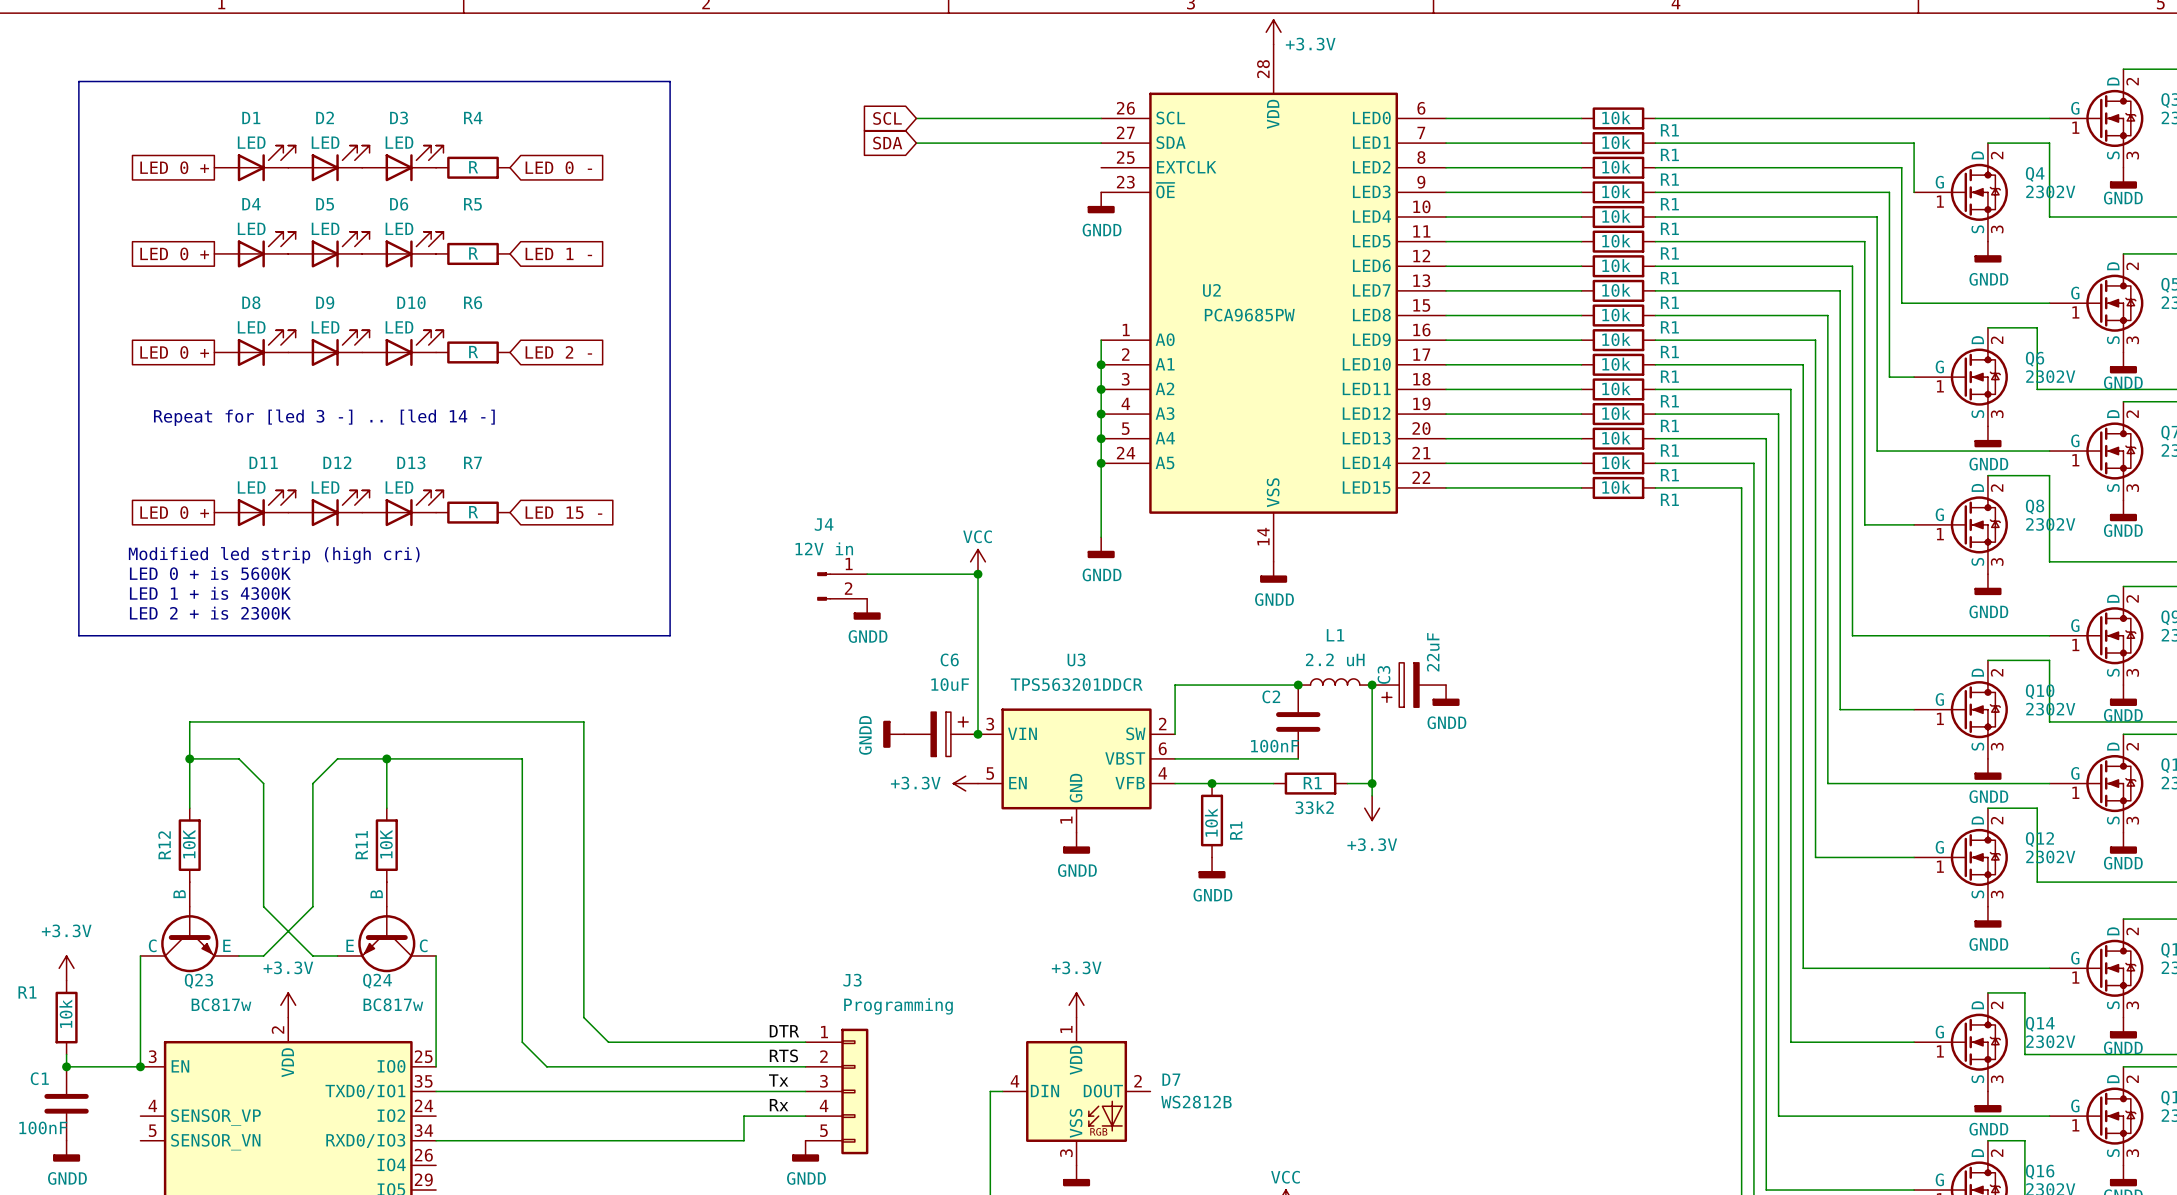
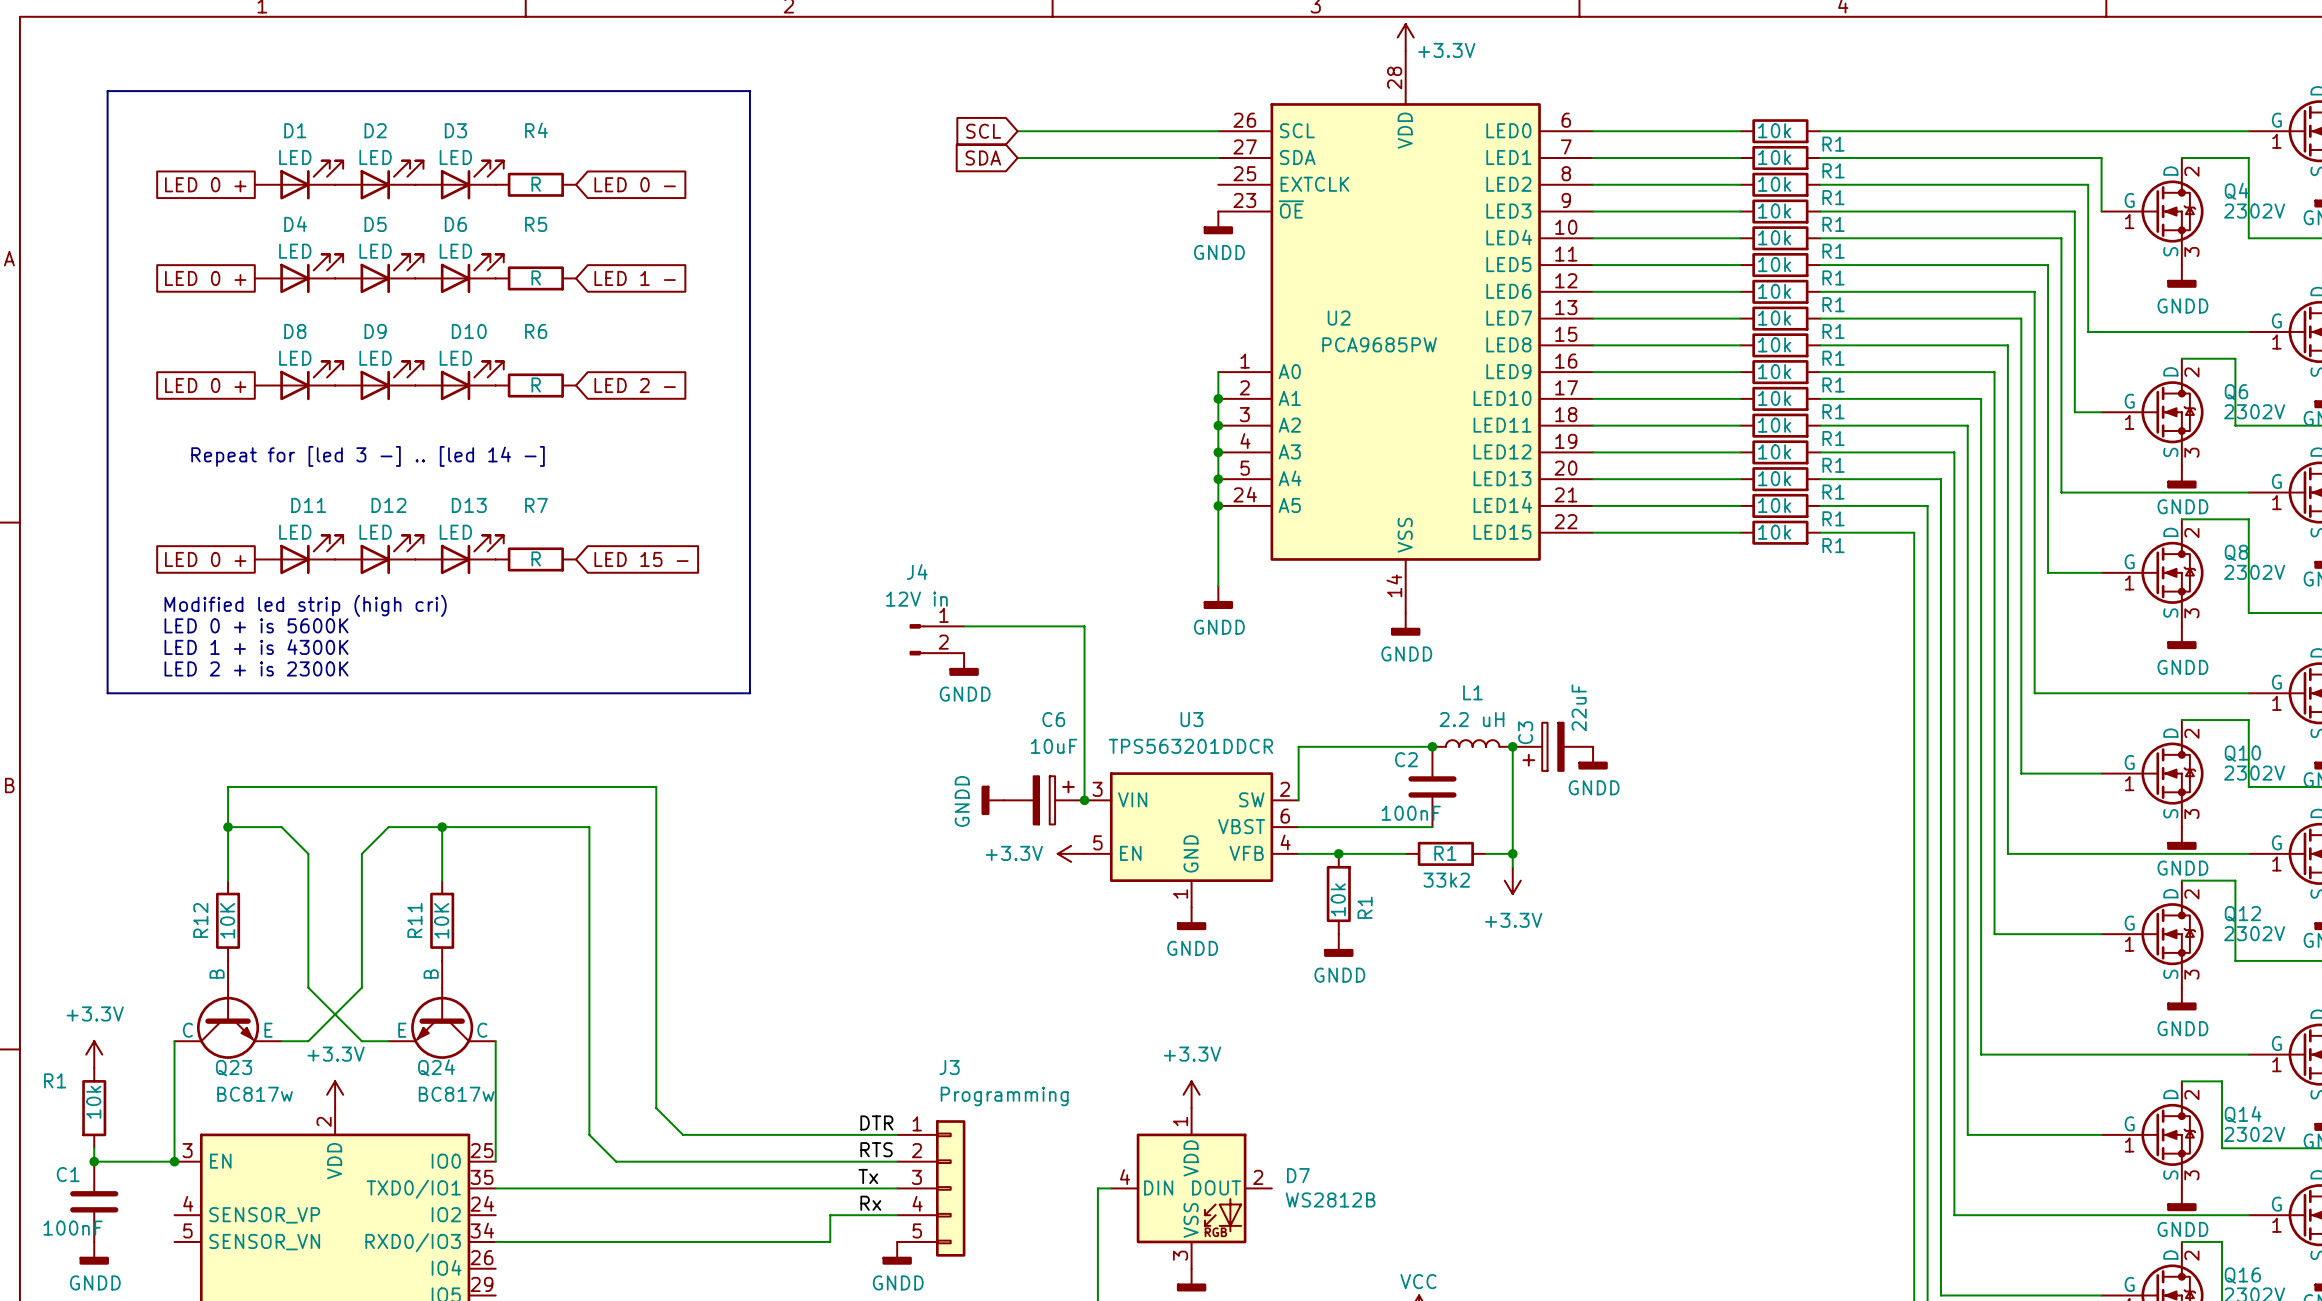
power symbol: VCC (978, 561) -> none
junction: (978, 574) -> none

